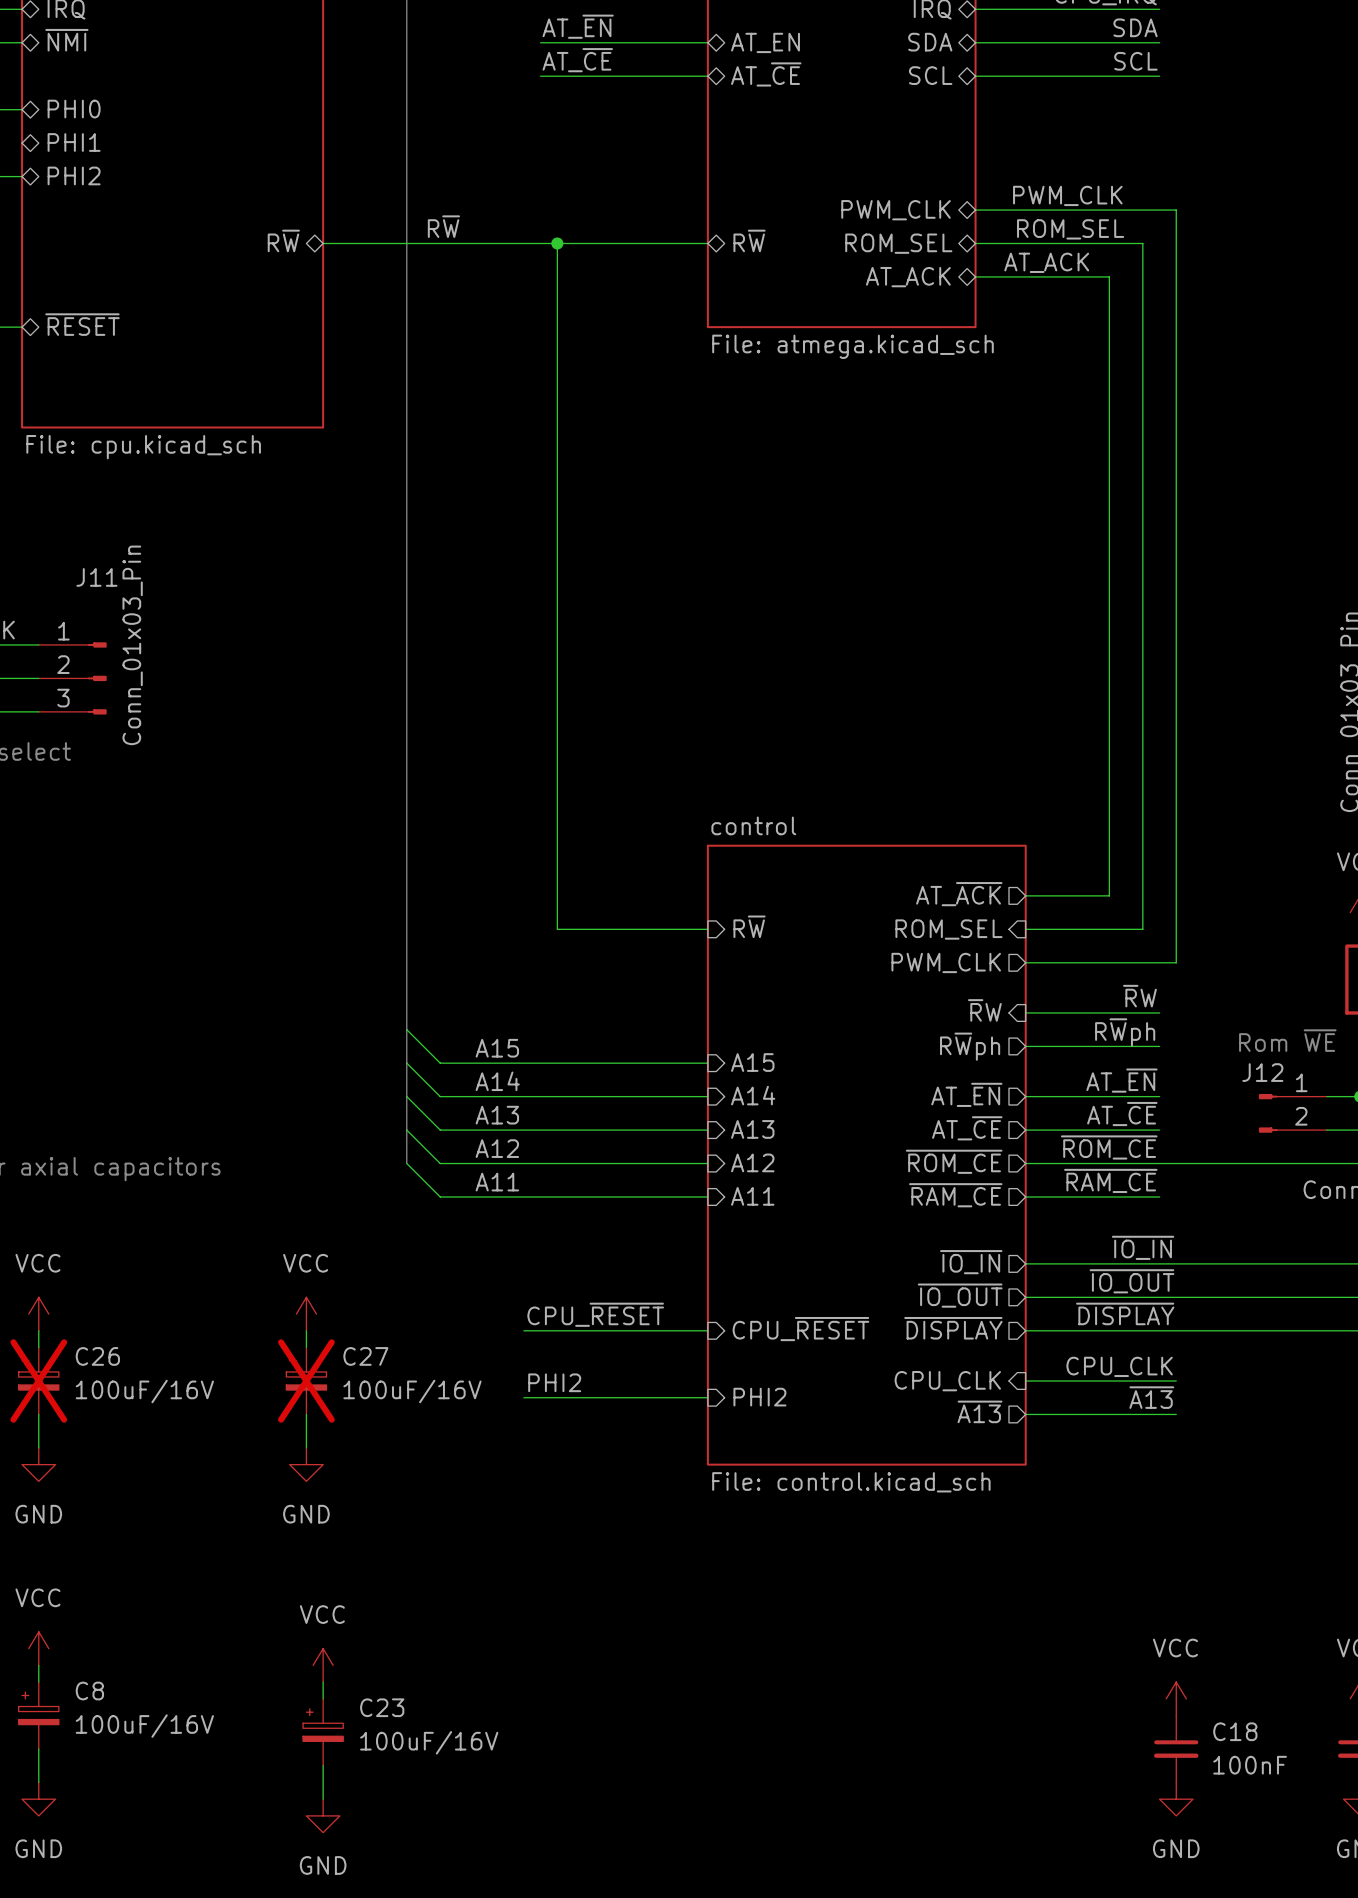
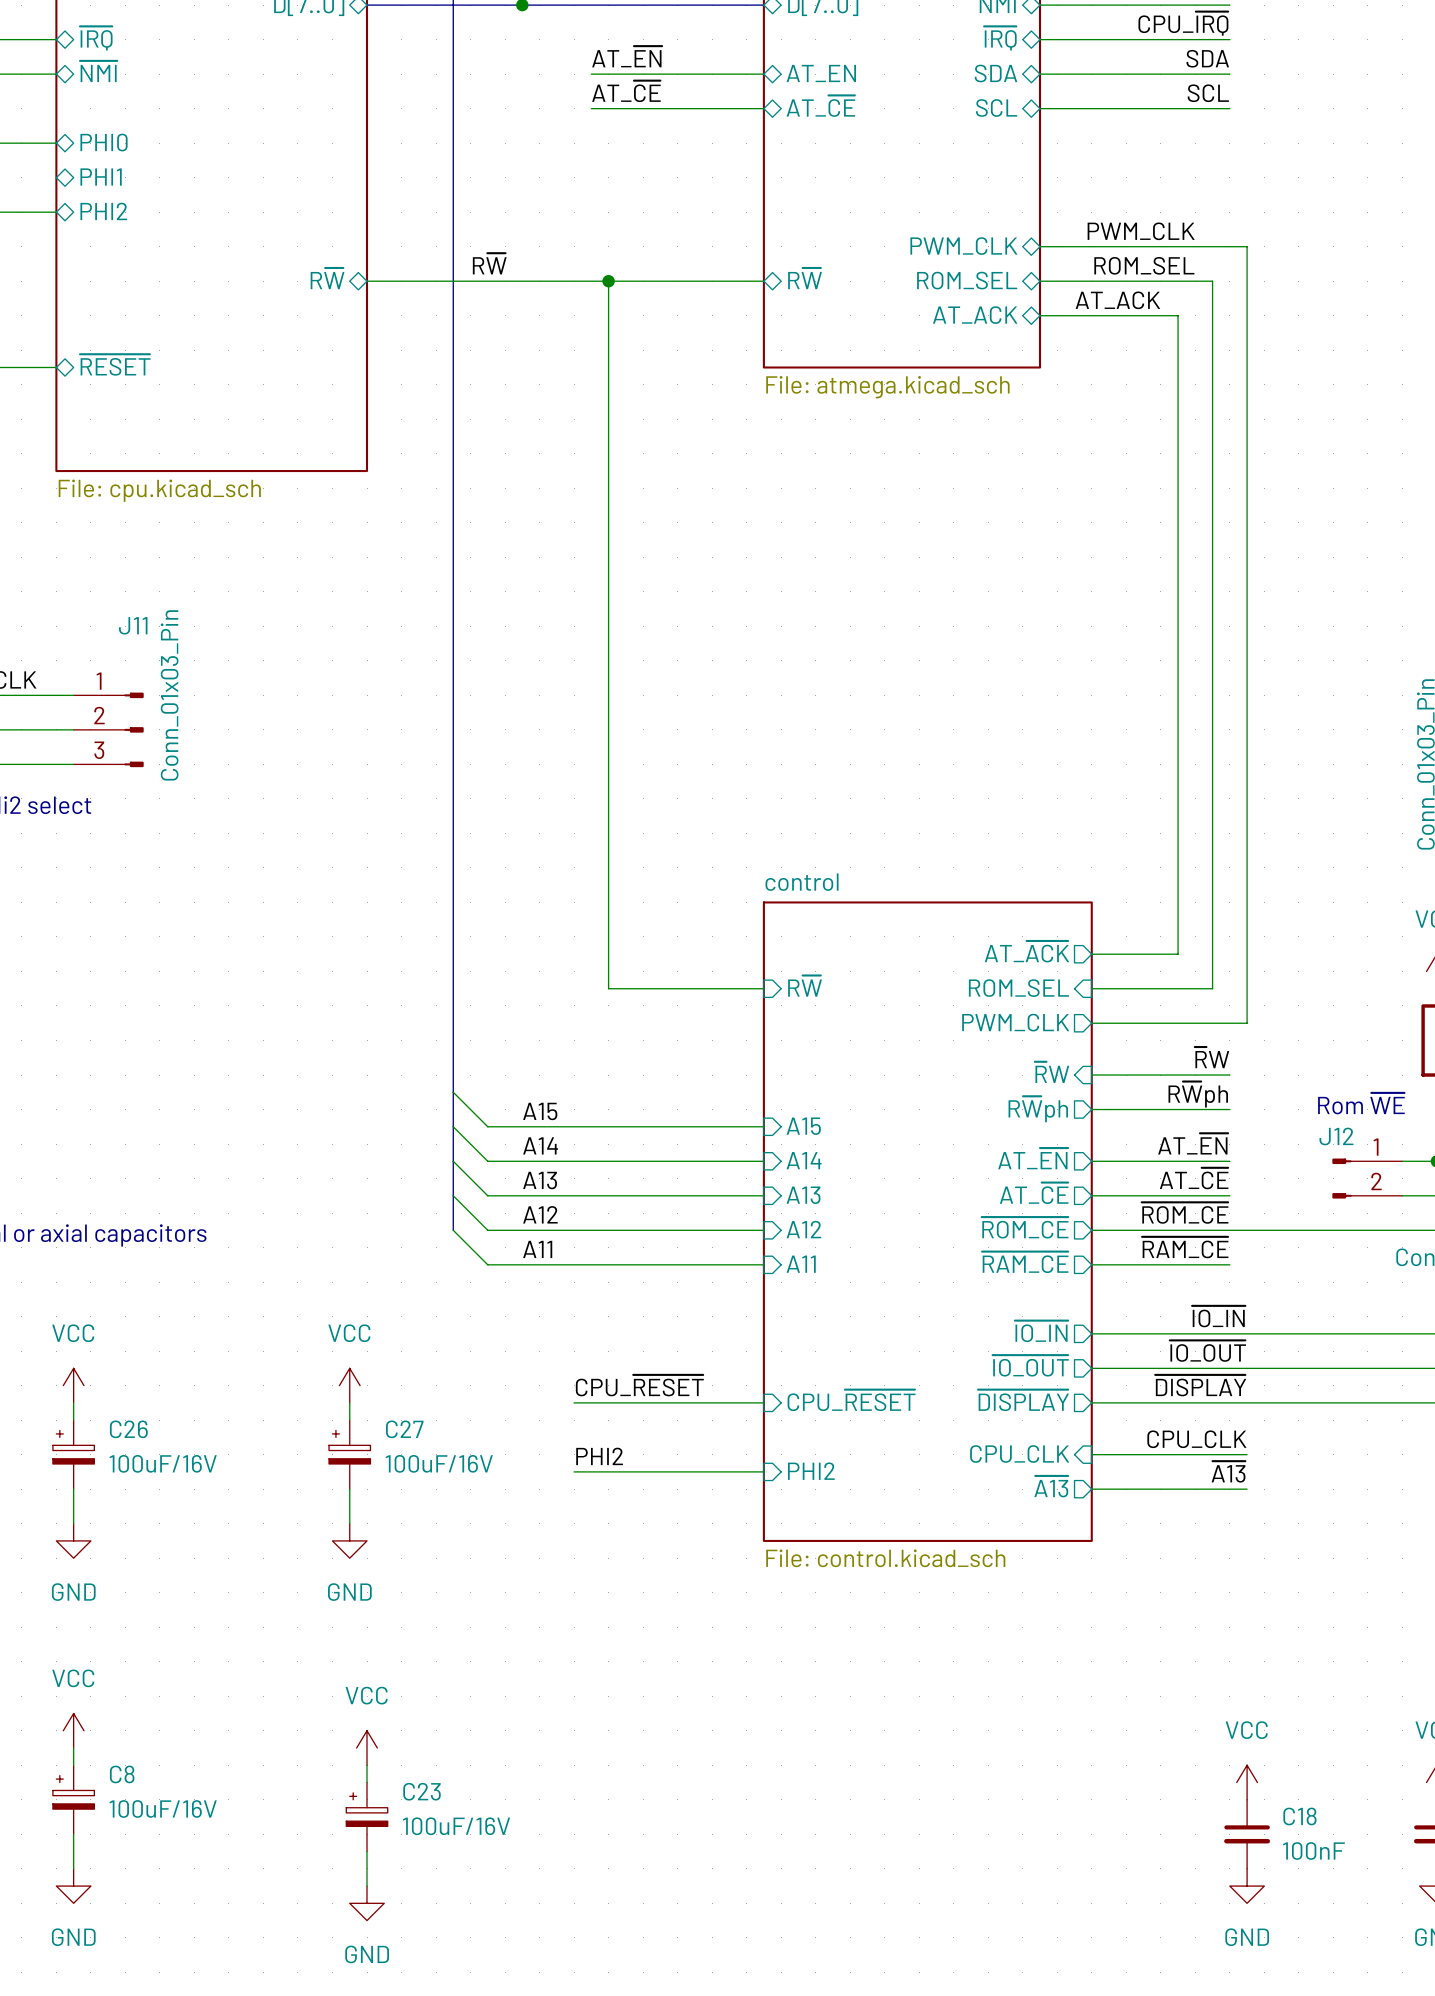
C26 do-not-place cross: (38, 1380) -> none
C27 do-not-place cross: (306, 1380) -> none

